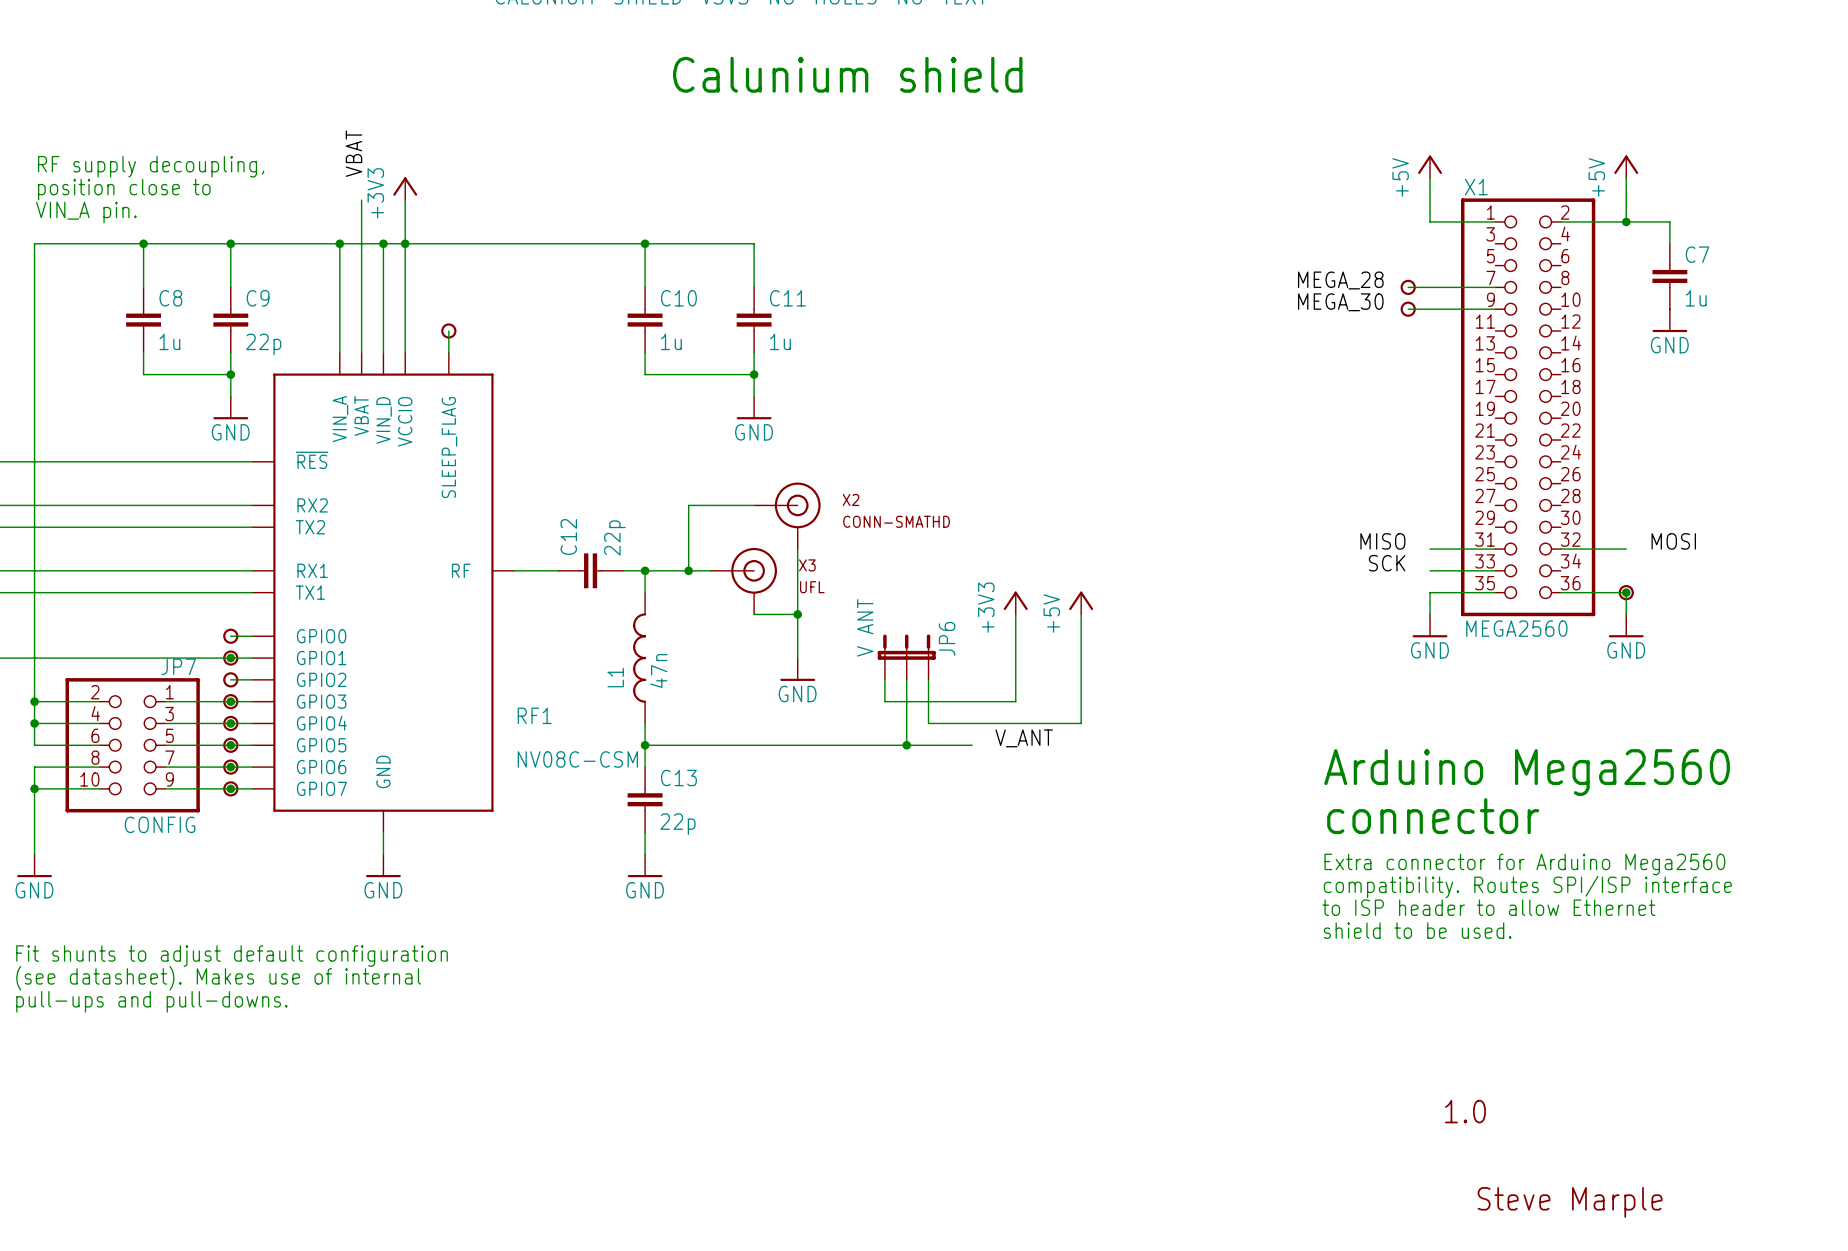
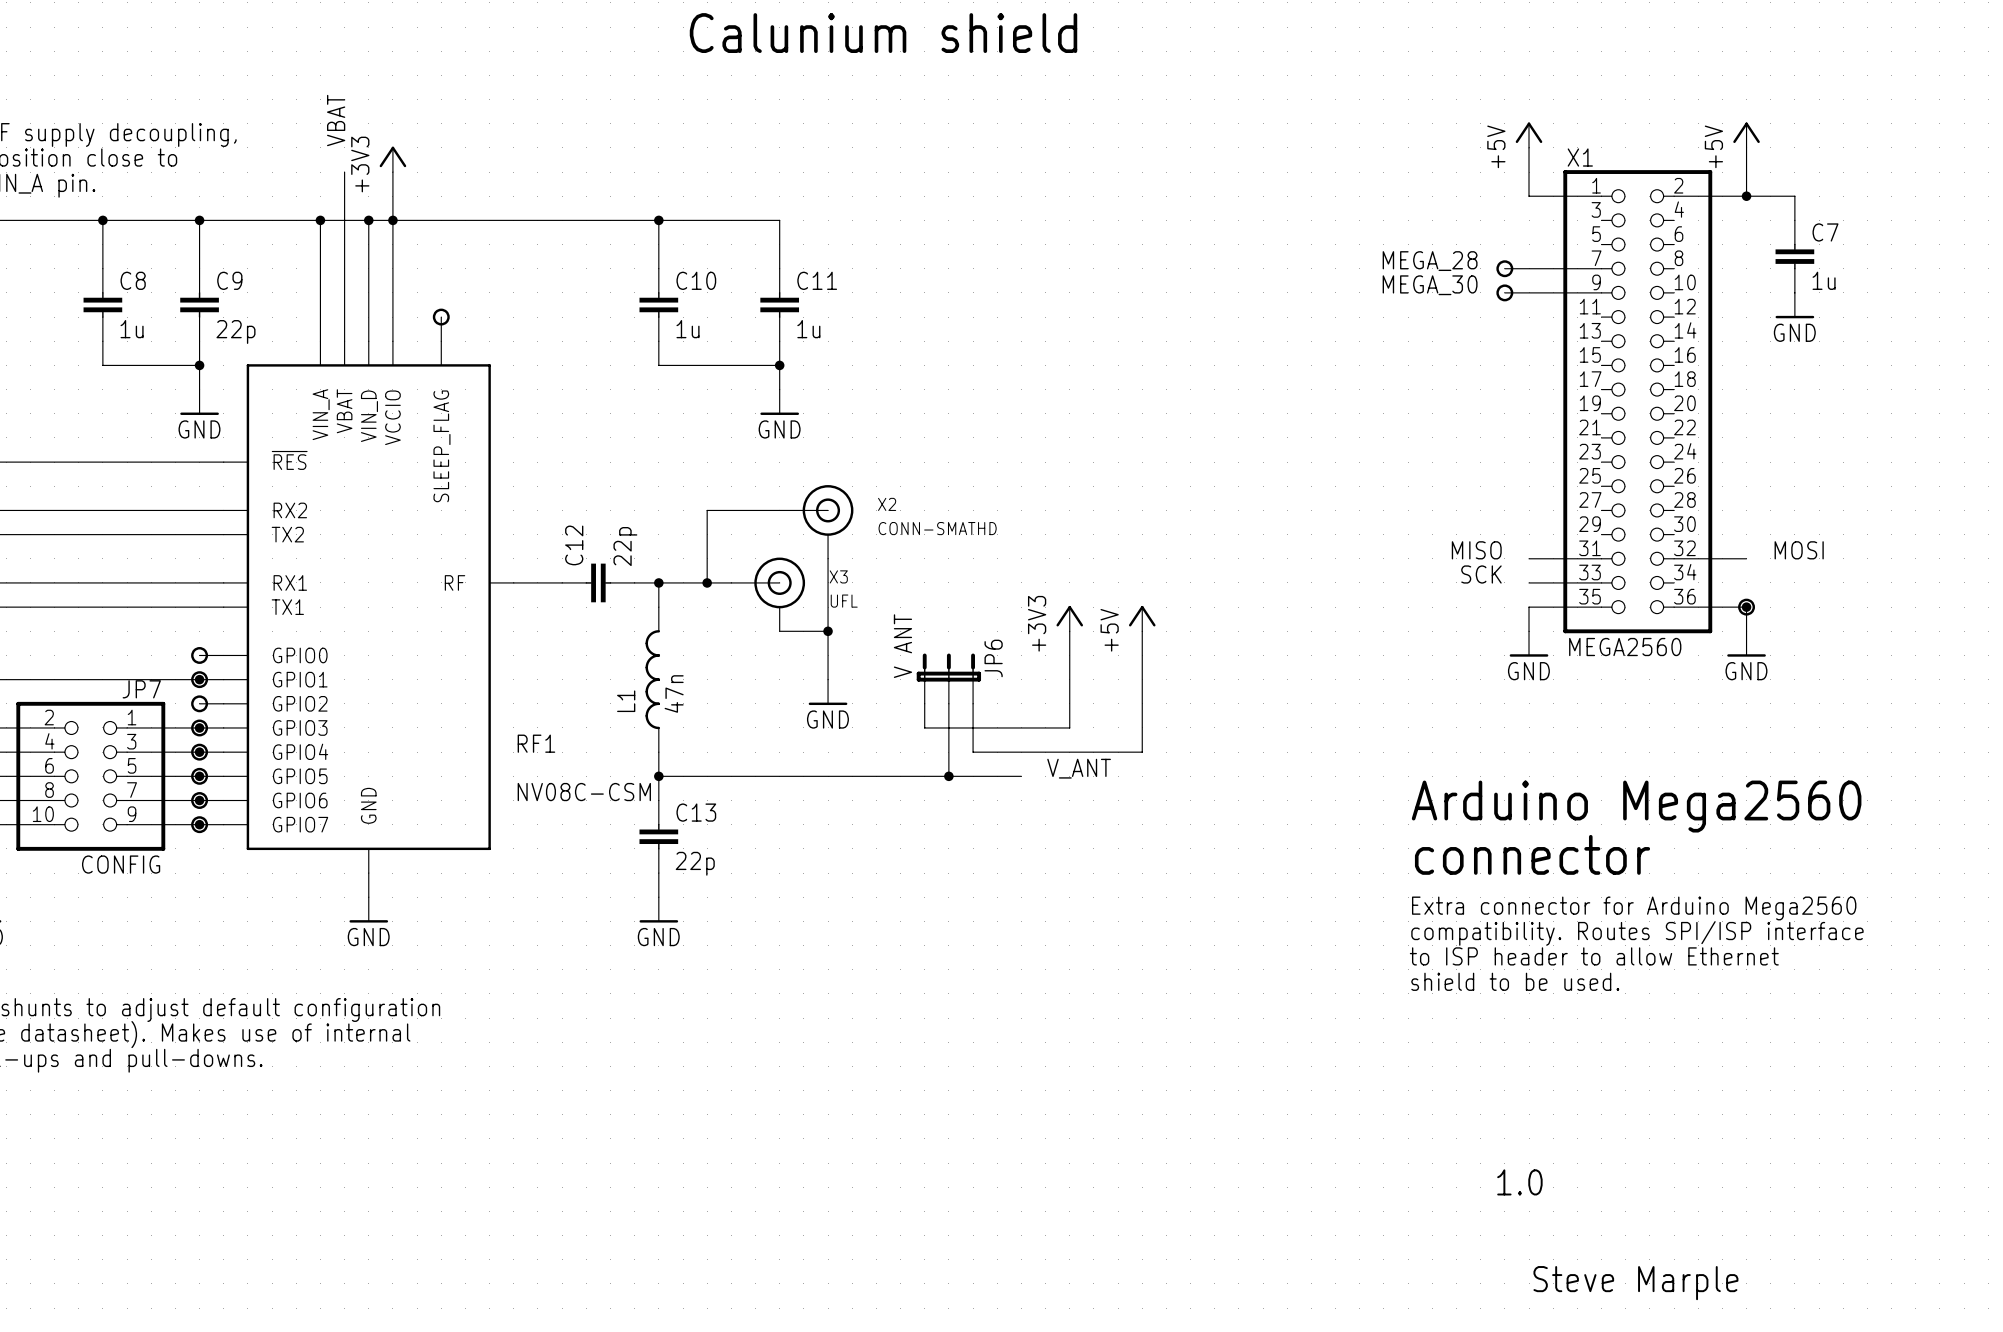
text position: 1.0 (1465, 1111) -> 1.0 (1519, 1182)
text position: Steve Marple (1570, 1202) -> Steve Marple (1635, 1283)

